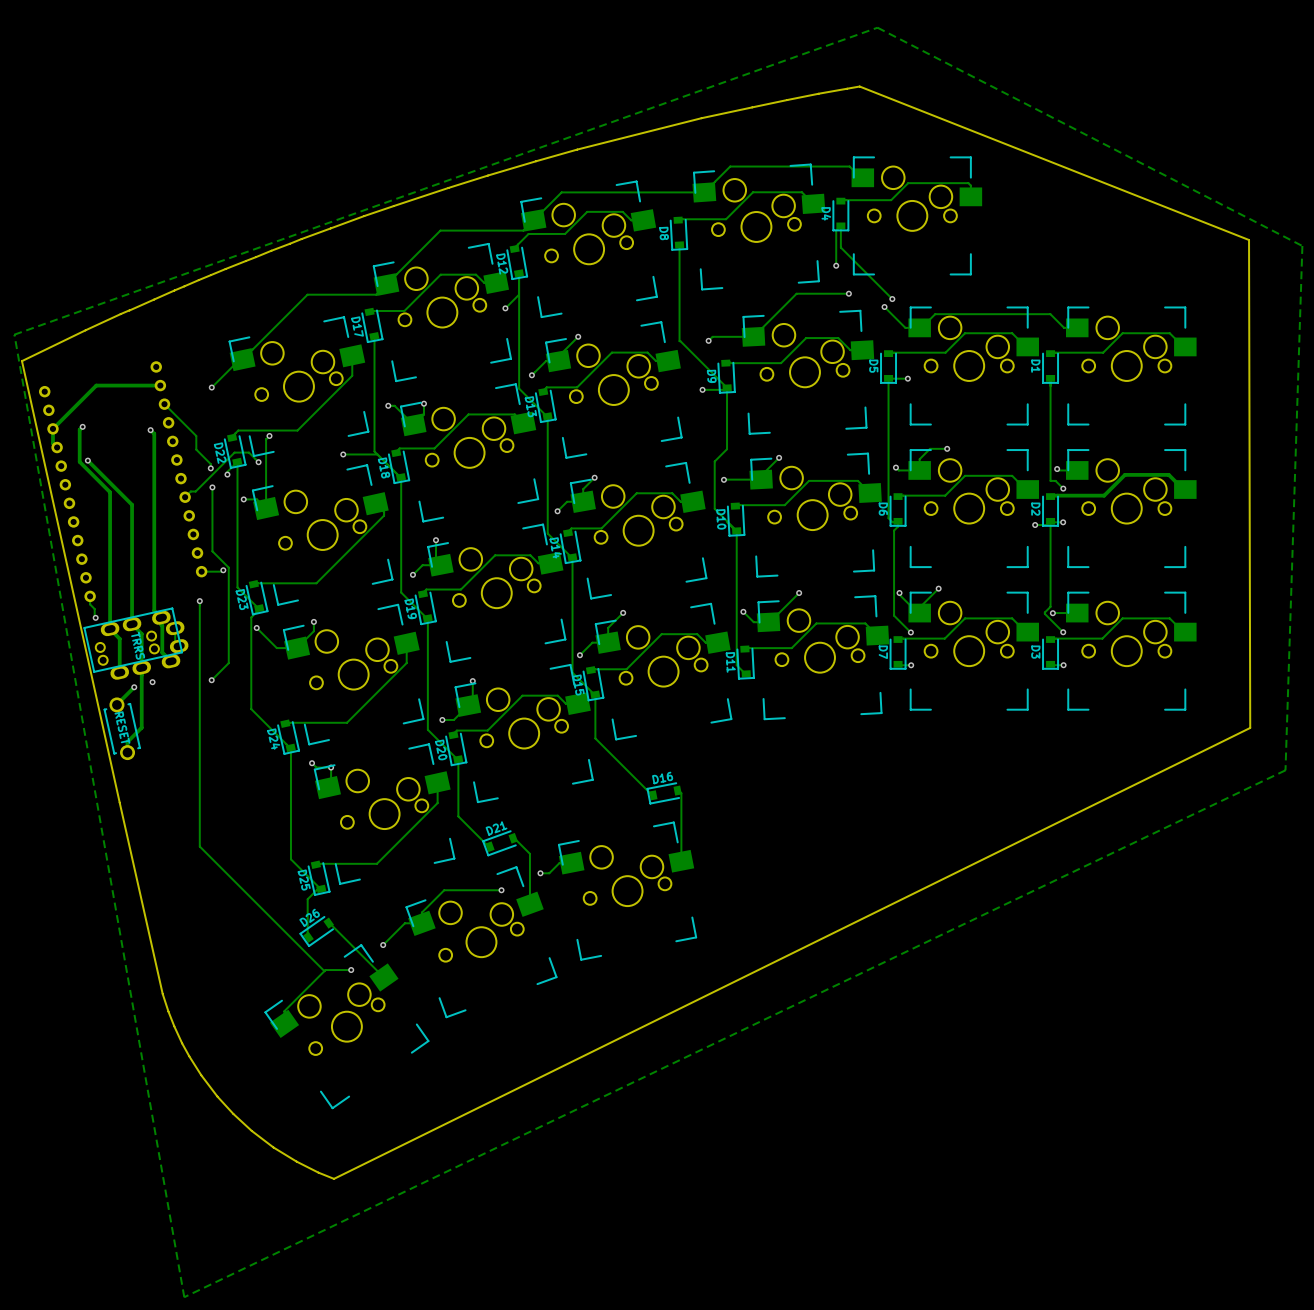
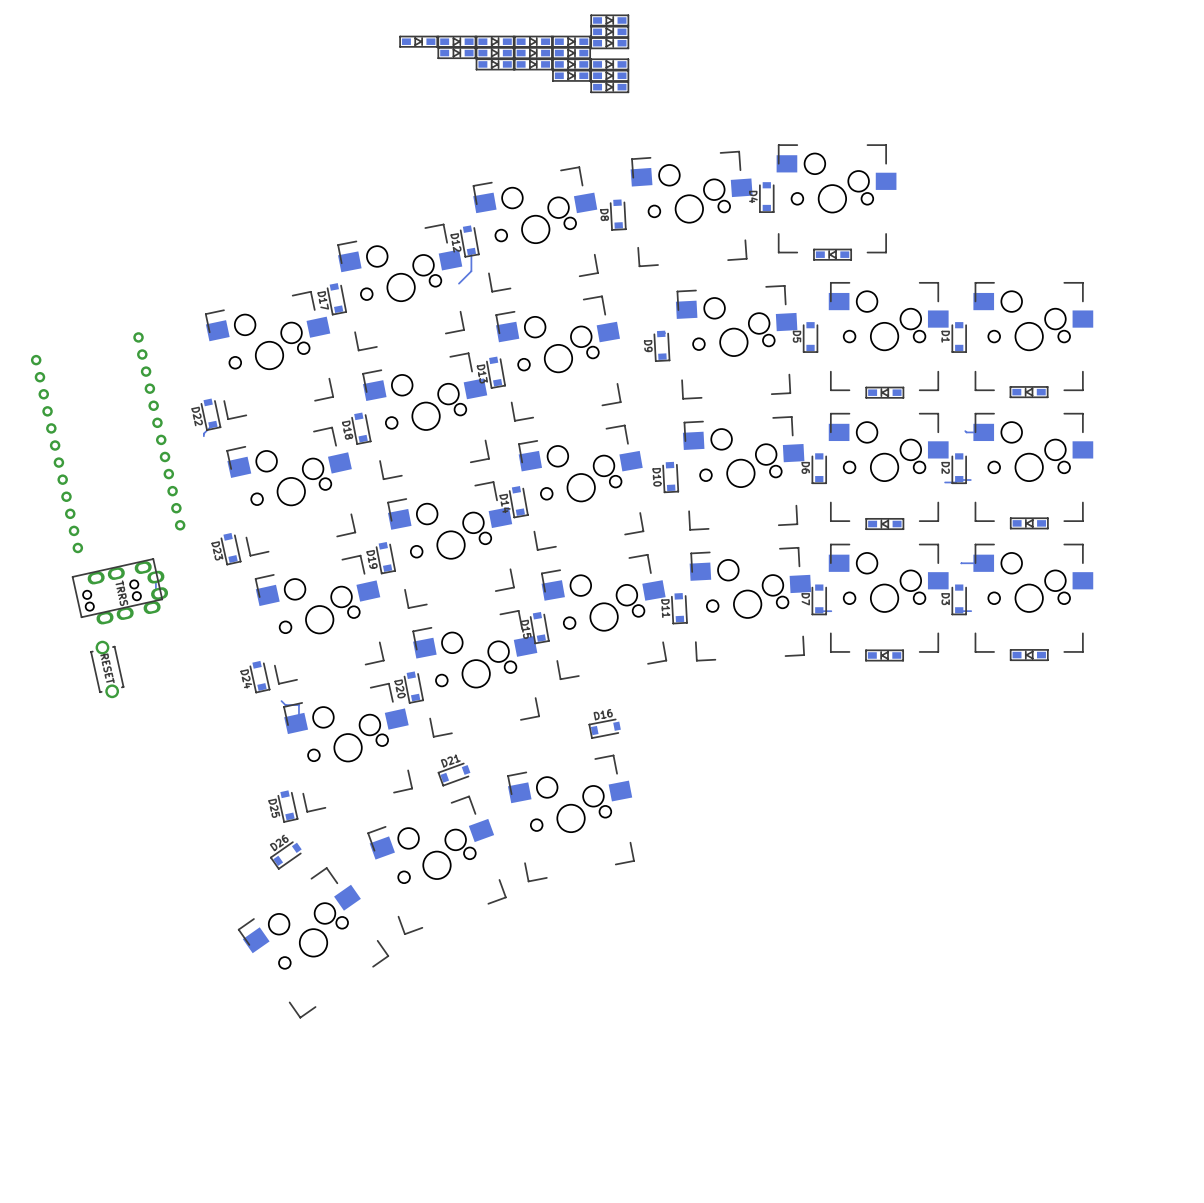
part: none -> (609, 20)
zone outline: (877, 27) (14, 334) (184, 1297) (1285, 770) (1302, 246) (877, 27) -> none
part: none -> (609, 31)
part: none -> (418, 41)
part: none -> (456, 41)
part: none -> (495, 41)
part: none -> (533, 41)
part: none -> (571, 41)
part: none -> (609, 43)
part: none -> (456, 53)
part: none -> (495, 53)
part: none -> (533, 53)
part: none -> (571, 53)
part: none -> (495, 64)
part: none -> (533, 64)
part: none -> (571, 64)
part: none -> (609, 64)
part: none -> (571, 75)
part: none -> (609, 75)
part: none -> (609, 87)
track: (862, 177) (849, 166) (730, 166) (704, 192) (561, 192) (523, 230) (440, 230) (376, 294) (307, 294) (211, 387) -> none
track: (970, 196) (970, 185) (968, 183) (908, 183) (891, 200) (840, 200) -> none
track: (813, 203) (801, 192) (753, 192) (726, 219) (678, 219) -> none
track: (643, 220) (631, 220) (622, 211) (587, 211) (565, 233) (528, 233) (514, 248) -> none
board edge: (1248, 240) (859, 86) (701, 118) (577, 149) (488, 175) (364, 216) (301, 239) (198, 280) (129, 310) -> none
board edge: (1249, 240) (1250, 727) (334, 1178) (296, 1161) (273, 1147) (233, 1113) (217, 1096) (189, 1056) (174, 1026) (162, 993) (21, 361) (129, 310) -> none
track: (679, 245) (679, 341) (727, 387) -> none
track: (836, 265) (836, 230) (840, 225) (840, 247) (892, 299) -> none
via: (836, 265) -> none
track: (519, 274) (519, 388) (547, 417) (547, 533) (572, 558) (572, 672) (595, 695) (595, 738) (652, 795) -> none
part: none -> (832, 254)
track: (496, 282) (483, 282) (476, 274) (440, 274) (404, 310) (369, 310) -> none
track: (848, 293) (796, 293) (753, 336) (712, 336) (708, 340) -> none
via: (848, 293) -> none
via: (892, 299) -> none
track: (884, 307) (905, 327) (921, 327) (935, 314) (1050, 314) (1064, 327) (1077, 327) -> none
via: (884, 307) -> none
via: (505, 308) -> none
track: (578, 336) (558, 356) (558, 361) (546, 361) (531, 375) -> none
via: (578, 336) -> none
track: (374, 337) (374, 451) (401, 478) (401, 592) (427, 619) (427, 729) (458, 760) (458, 816) (489, 847) -> none
via: (708, 340) -> none
track: (1027, 346) (1012, 333) (965, 333) (945, 352) (888, 352) -> none
track: (1185, 346) (1169, 333) (1122, 333) (1103, 352) (1050, 352) -> none
track: (862, 350) (850, 350) (838, 338) (806, 338) (781, 363) (725, 363) -> none
track: (352, 355) (352, 375) (297, 430) (238, 430) (231, 436) -> none
track: (668, 361) (656, 361) (647, 352) (611, 352) (577, 387) (546, 387) (543, 391) -> none
via: (531, 375) -> none
track: (888, 378) (907, 378) -> none
via: (907, 378) -> none
track: (888, 379) (888, 518) (892, 522) (898, 522) -> none
track: (1050, 379) (1050, 480) (1055, 480) (1063, 488) -> none
track: (160, 385) (96, 385) (52, 428) (52, 443) (57, 447) -> none
via: (211, 387) -> none
track: (727, 387) (725, 389) (702, 389) -> none
track: (727, 387) (727, 449) (714, 461) (714, 508) (736, 530) -> none
via: (702, 389) -> none
track: (423, 403) (423, 414) (413, 424) (394, 405) (388, 405) -> none
via: (423, 403) -> none
track: (164, 404) (196, 435) (196, 449) (210, 464) (210, 468) -> none
via: (388, 405) -> none
track: (523, 422) (514, 414) (468, 414) (434, 448) (399, 448) (396, 452) -> none
track: (82, 426) (79, 429) (79, 461) (110, 492) (110, 629) (119, 638) (119, 672) -> none
via: (82, 426) -> none
part: none -> (1029, 392)
part: none -> (884, 392)
track: (150, 430) (154, 433) (154, 610) (161, 617) (162, 652) (171, 661) -> none
via: (150, 430) -> none
track: (269, 435) (266, 439) (266, 508) (257, 499) (243, 499) -> none
via: (269, 435) -> none
track: (947, 448) (930, 448) (919, 459) (919, 470) (898, 470) (895, 467) -> none
via: (947, 448) -> none
via: (343, 454) -> none
track: (377, 454) (343, 454) -> none
track: (779, 457) (761, 475) (761, 479) (723, 479) -> none
via: (779, 457) -> none
track: (87, 460) (132, 504) (132, 624) (141, 633) (141, 727) (127, 741) (127, 752) -> none
via: (87, 460) -> none
track: (237, 462) (237, 587) (259, 609) (251, 617) (251, 709) (290, 748) (290, 859) (321, 889) (317, 889) (307, 899) (307, 937) -> none
track: (258, 462) (248, 452) (234, 452) (195, 491) (190, 491) (185, 497) -> none
via: (258, 462) -> none
via: (895, 467) -> none
via: (210, 468) -> none
via: (1057, 469) -> none
via: (227, 474) -> none
track: (594, 477) (583, 489) (583, 501) (567, 501) (557, 511) -> none
via: (594, 477) -> none
via: (723, 479) -> none
track: (212, 487) (212, 551) (228, 567) (228, 663) (211, 680) -> none
via: (212, 487) -> none
via: (1063, 488) -> none
track: (1027, 489) (1012, 475) (965, 475) (945, 495) (898, 495) -> none
track: (1185, 489) (1168, 474) (1124, 474) (1104, 495) (1050, 495) (1055, 495) -> none
track: (870, 493) (857, 480) (809, 480) (784, 505) (735, 505) -> none
via: (243, 499) -> none
track: (692, 501) (680, 501) (672, 493) (636, 493) (601, 528) (571, 528) (567, 532) -> none
track: (375, 503) (384, 512) (384, 515) (316, 583) (253, 583) -> none
via: (557, 511) -> none
track: (898, 521) (898, 526) (894, 530) (894, 615) (910, 632) -> none
track: (1050, 521) (1050, 606) (1044, 613) (1063, 632) -> none
track: (727, 522) (736, 531) (736, 665) (746, 674) -> none
via: (1063, 522) -> none
via: (1035, 525) -> none
track: (436, 540) (436, 560) (440, 565) (422, 565) (412, 574) -> none
via: (436, 540) -> none
track: (550, 563) (538, 563) (530, 555) (495, 555) (460, 589) (426, 589) (422, 593) -> none
part: none -> (1029, 523)
track: (223, 570) (201, 571) -> none
via: (223, 570) -> none
part: none -> (884, 524)
via: (412, 574) -> none
track: (938, 588) (919, 607) (919, 613) (899, 593) -> none
via: (938, 588) -> none
track: (799, 593) (769, 622) (753, 622) (743, 611) -> none
via: (799, 593) -> none
via: (899, 593) -> none
track: (90, 596) (90, 604) (94, 609) (95, 617) -> none
track: (199, 601) (199, 846) (324, 971) -> none
via: (199, 601) -> none
via: (743, 611) -> none
track: (623, 612) (608, 627) (608, 642) (592, 642) (579, 655) -> none
via: (623, 612) -> none
via: (1052, 613) -> none
via: (95, 617) -> none
track: (313, 621) (313, 631) (297, 648) (276, 648) (256, 627) -> none
via: (313, 621) -> none
via: (256, 627) -> none
via: (910, 632) -> none
track: (1027, 632) (1012, 618) (965, 618) (944, 638) (898, 638) -> none
via: (1063, 632) -> none
track: (1185, 632) (1169, 618) (1122, 618) (1102, 638) (1050, 638) -> none
track: (877, 635) (865, 623) (816, 623) (791, 648) (744, 648) -> none
track: (717, 642) (705, 642) (697, 634) (661, 634) (626, 669) (590, 669) -> none
track: (406, 643) (406, 663) (346, 722) (285, 722) -> none
via: (579, 655) -> none
via: (911, 665) -> none
via: (1063, 665) -> none
via: (211, 680) -> none
track: (472, 681) (472, 701) (453, 719) (442, 719) -> none
via: (472, 681) -> none
via: (152, 682) -> none
track: (134, 687) (116, 704) -> none
via: (134, 687) -> none
track: (578, 703) (565, 703) (557, 695) (522, 695) (487, 730) (456, 730) (453, 734) -> none
part: none -> (884, 655)
part: none -> (1029, 655)
via: (442, 719) -> none
via: (312, 763) -> none
via: (331, 767) -> none
track: (437, 782) (437, 803) (376, 863) (315, 863) -> none
track: (678, 790) (681, 793) (681, 861) -> none
track: (514, 837) (529, 853) (529, 904) -> none
track: (571, 863) (559, 863) (549, 873) (540, 873) -> none
via: (540, 873) -> none
track: (501, 890) (444, 890) (421, 912) (421, 923) (404, 923) (383, 945) -> none
via: (501, 890) -> none
track: (329, 922) (383, 977) -> none
via: (383, 945) -> none
track: (351, 970) (325, 970) (284, 1011) (284, 1023) -> none
via: (351, 970) -> none

